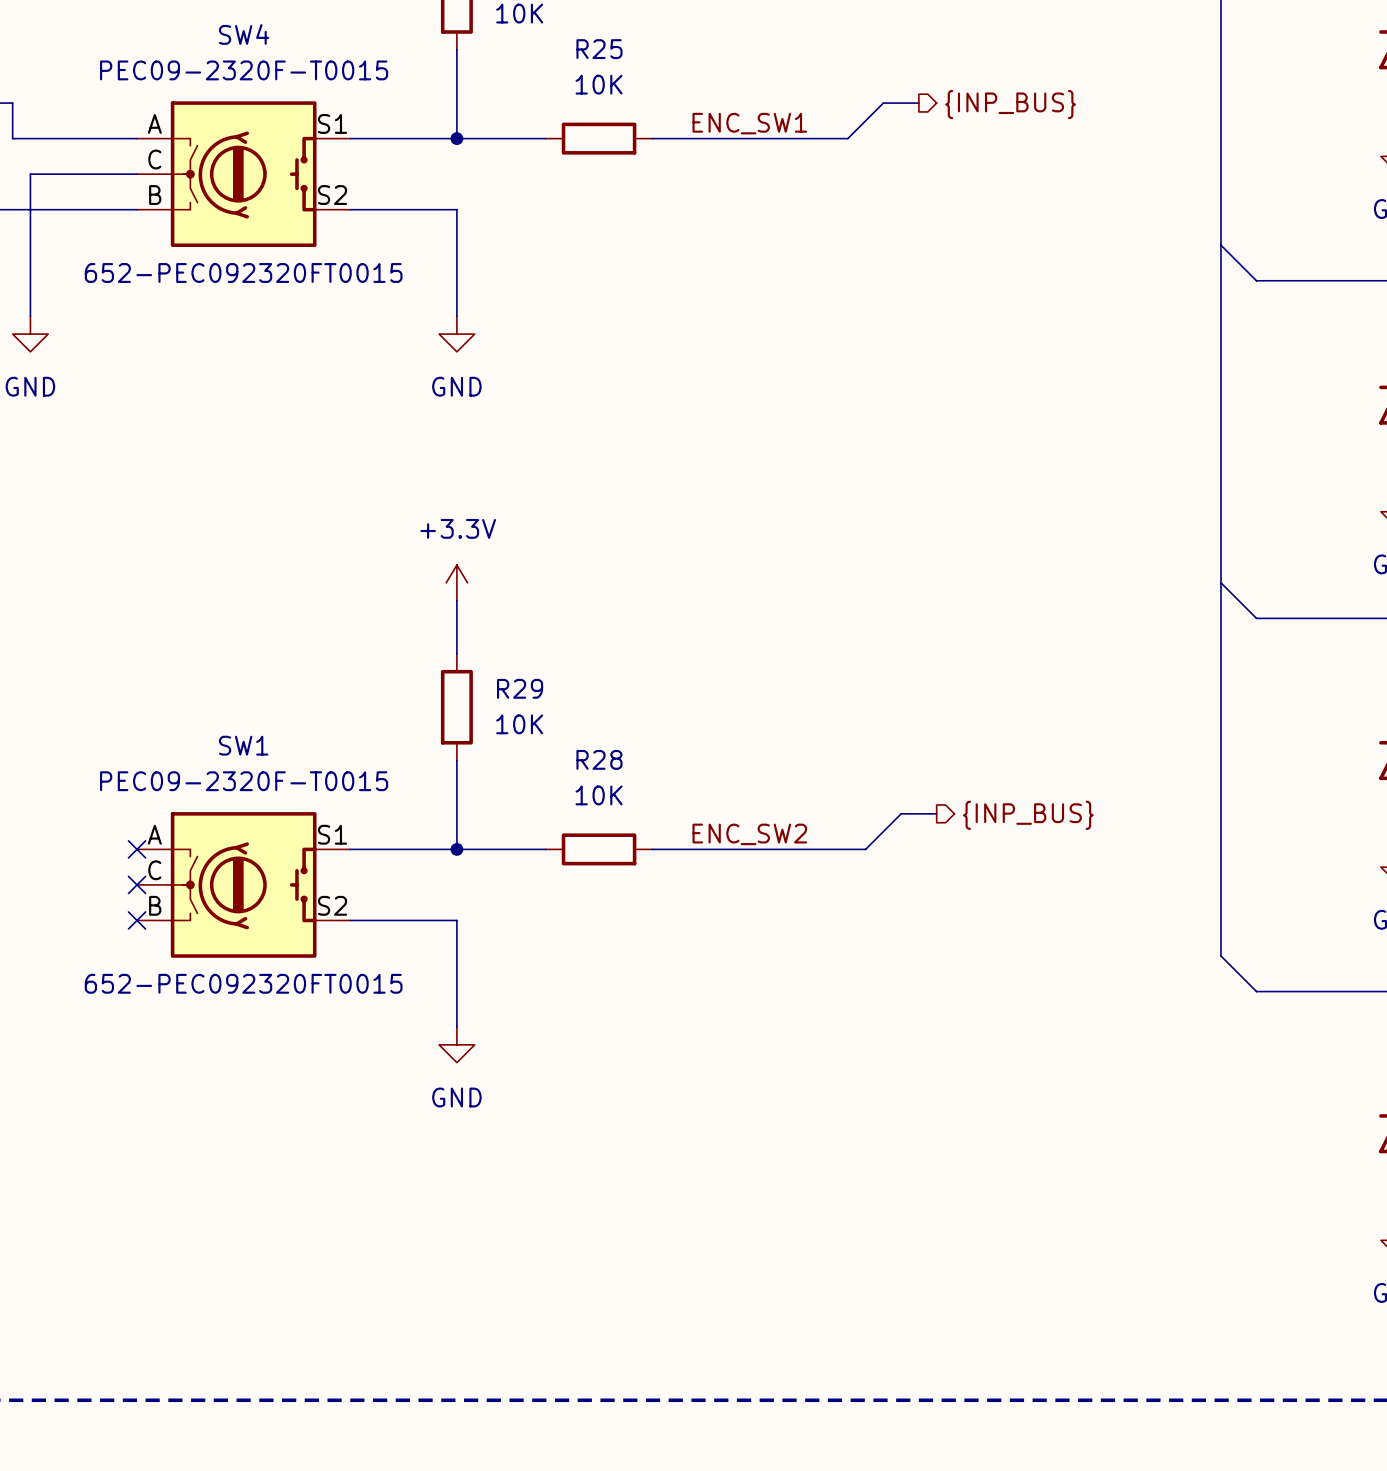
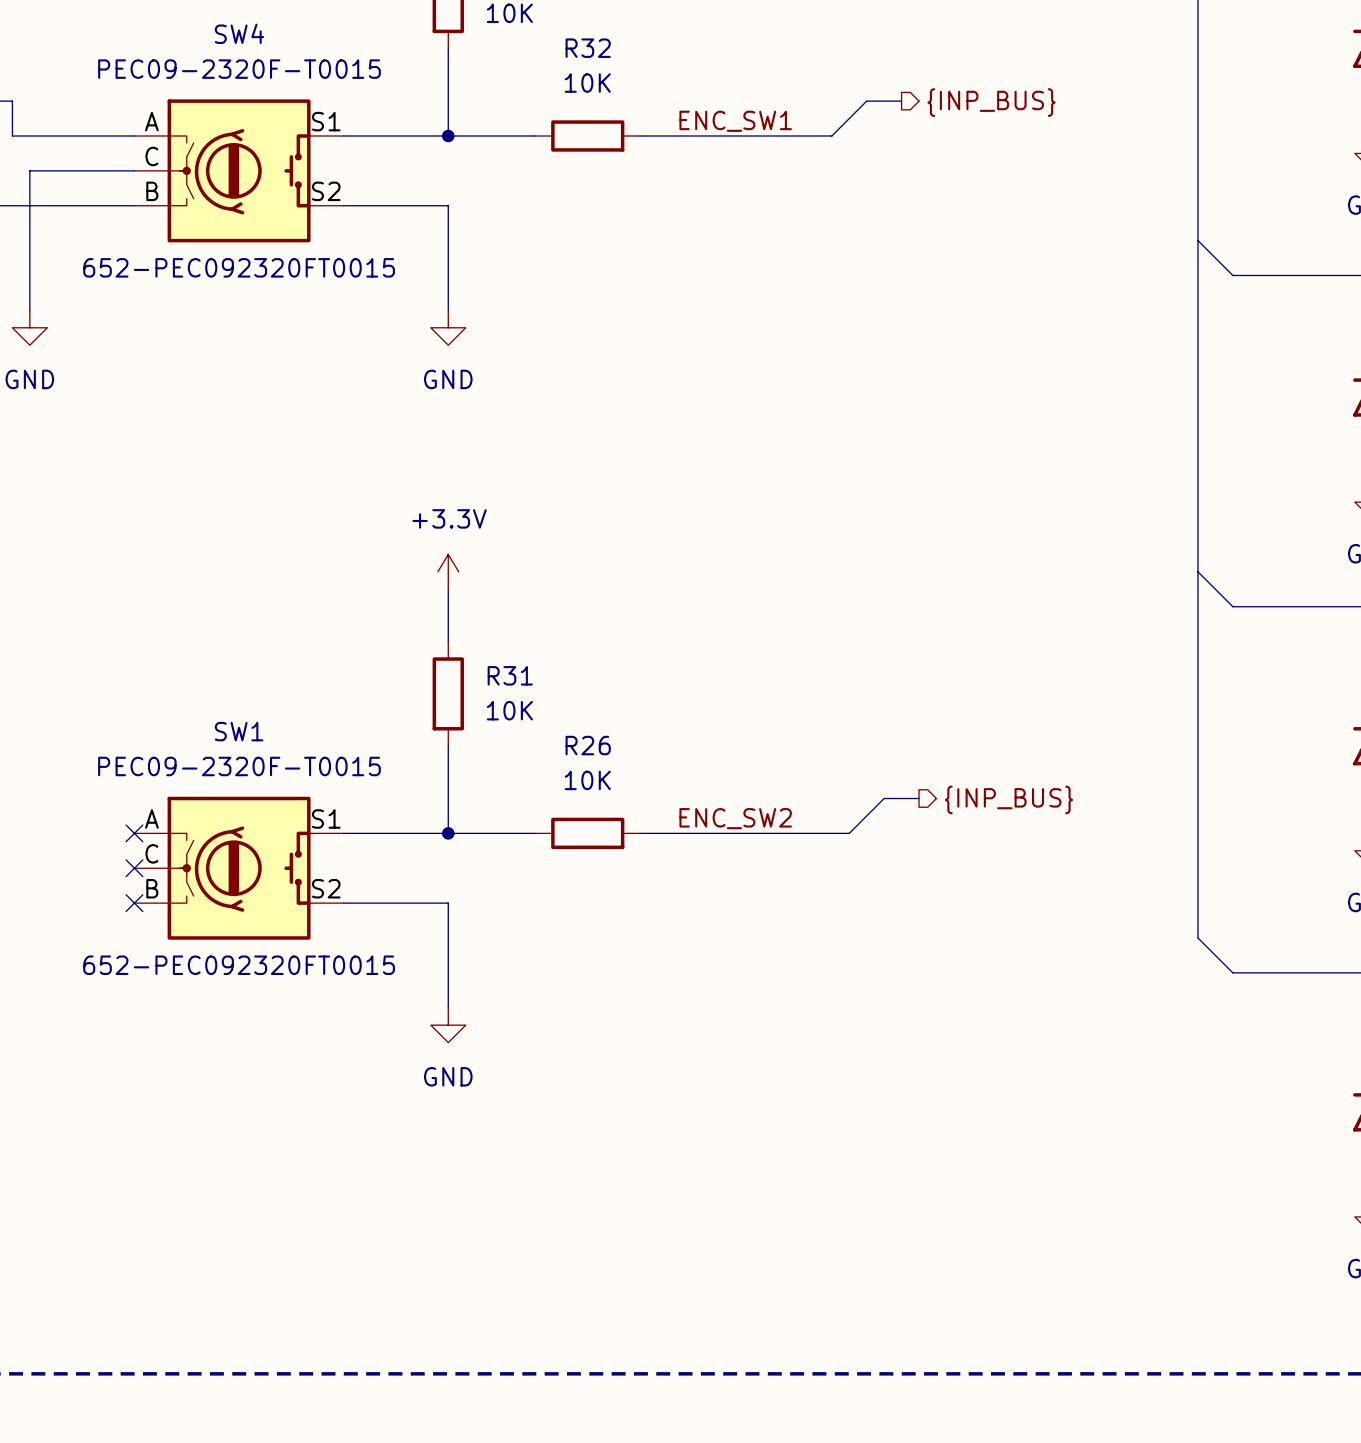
R25 name: R25 (599, 49) -> R32 (588, 48)
R29 name: R29 (520, 688) -> R31 (510, 675)
R28 name: R28 (599, 759) -> R26 (588, 745)

